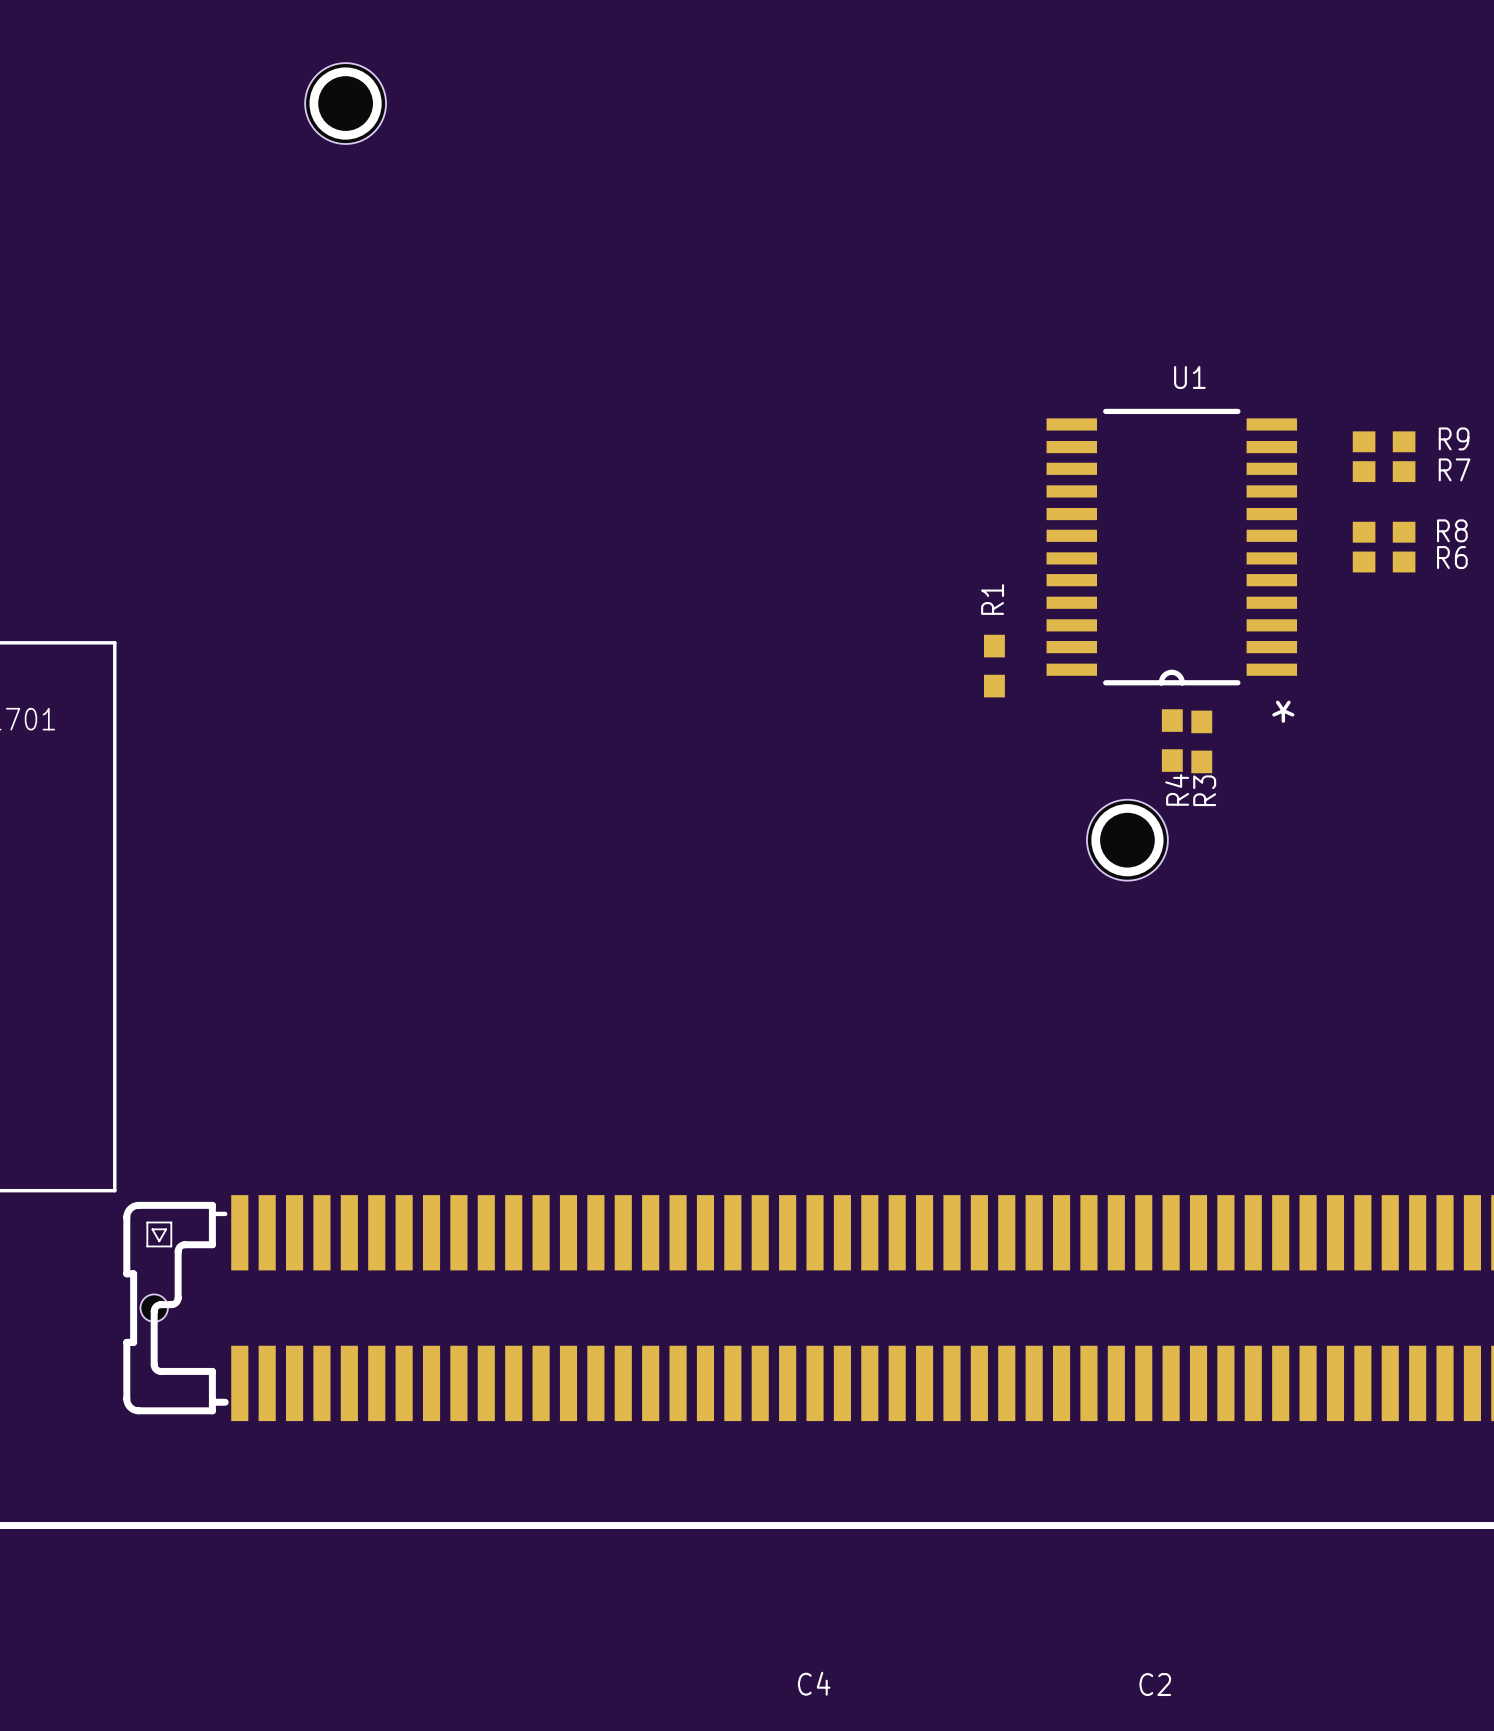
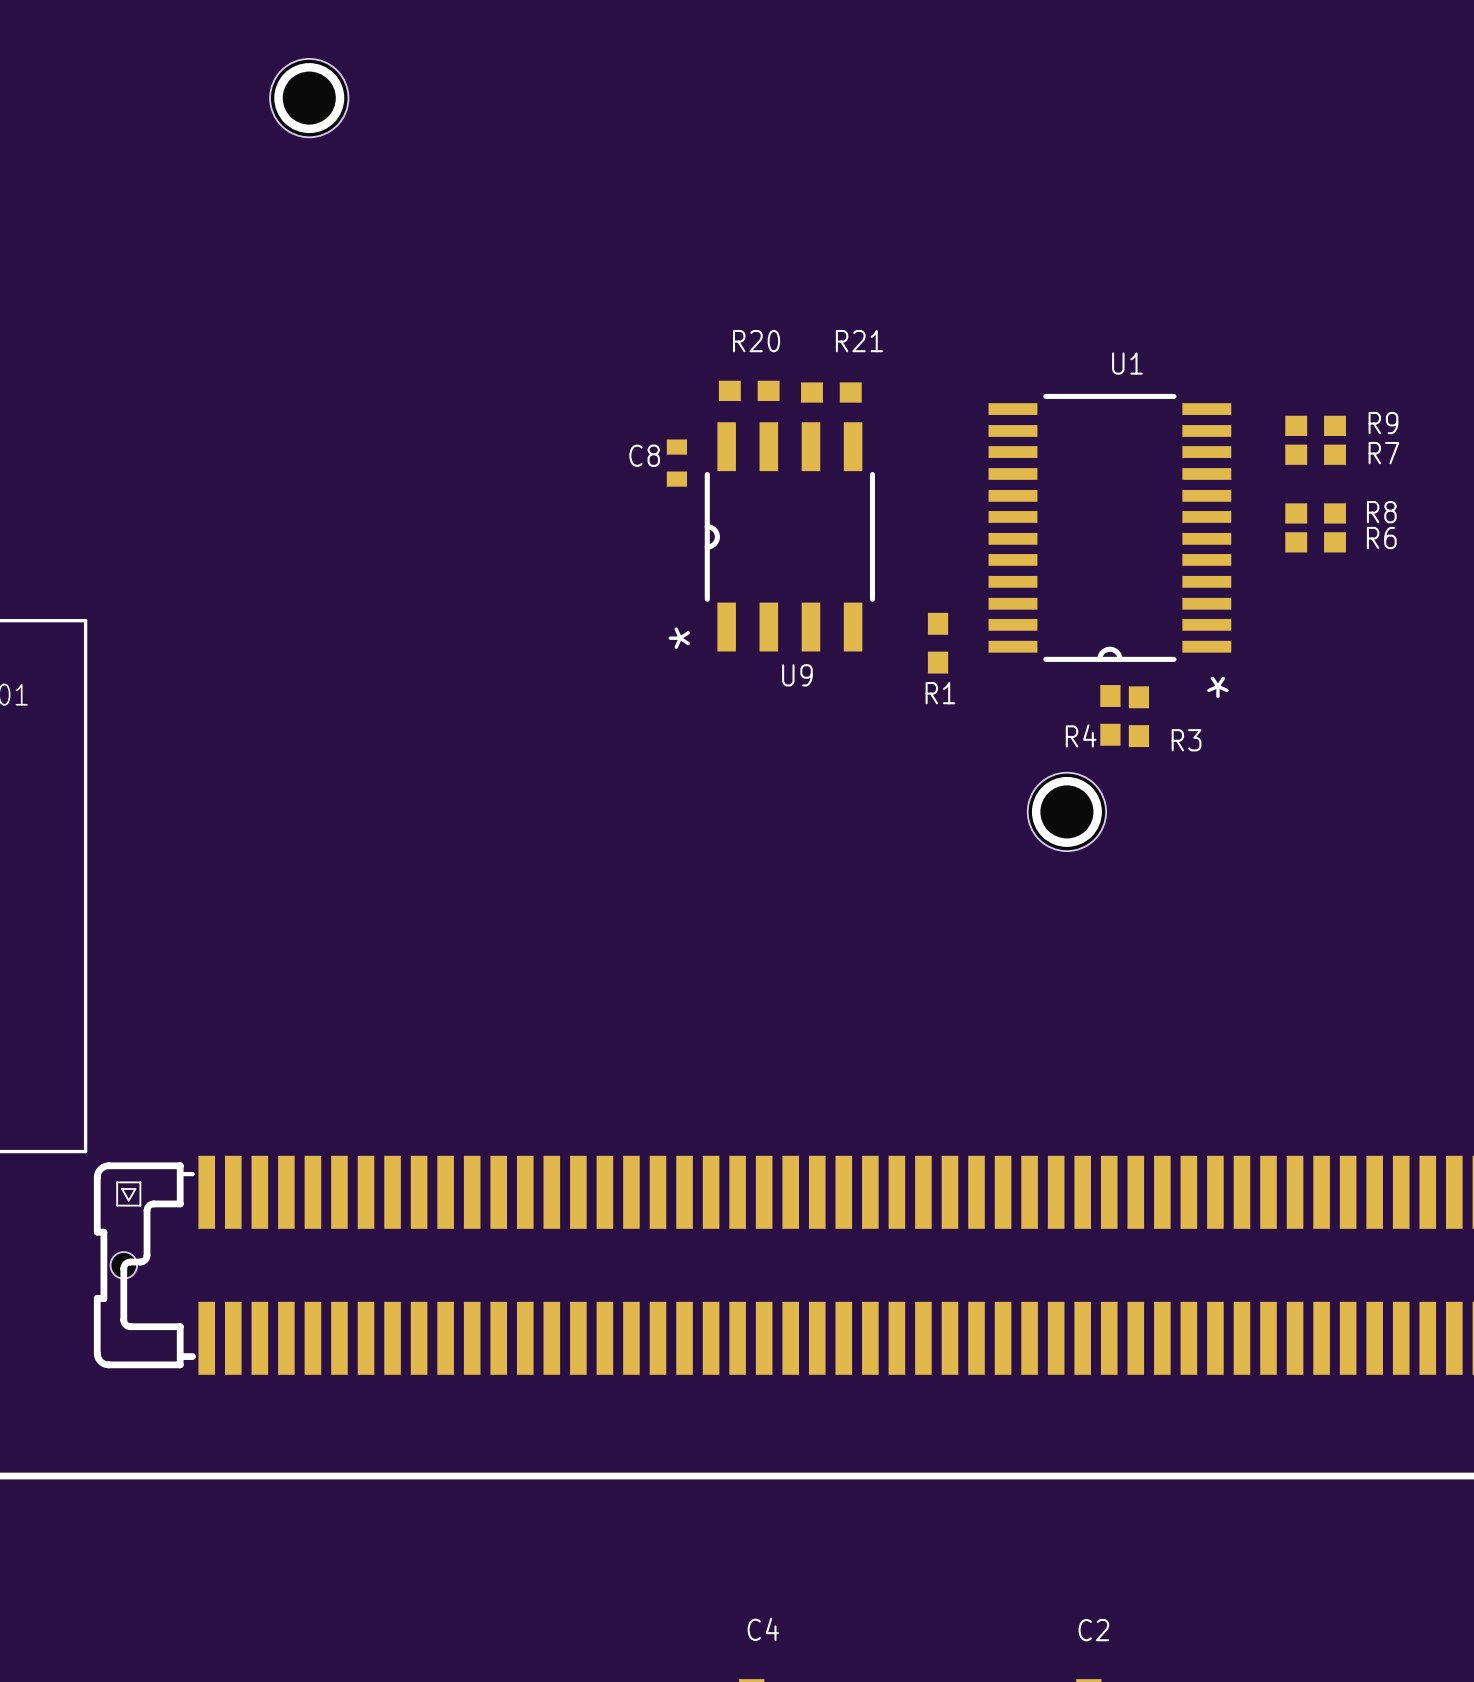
R20: none -> (749, 390)
R21: none -> (831, 392)
C8: none -> (676, 463)
U9: none -> (789, 536)
R1 name rotation: 0° (992, 599) -> 90° clockwise (940, 693)
R1 name position: R1 (992, 599) -> R1 (940, 693)
R4 name rotation: 0° (1177, 789) -> 90° clockwise (1081, 735)
R3 name rotation: 0° (1204, 790) -> 90° clockwise (1186, 740)
R3 name position: R3 (1204, 790) -> R3 (1186, 740)

